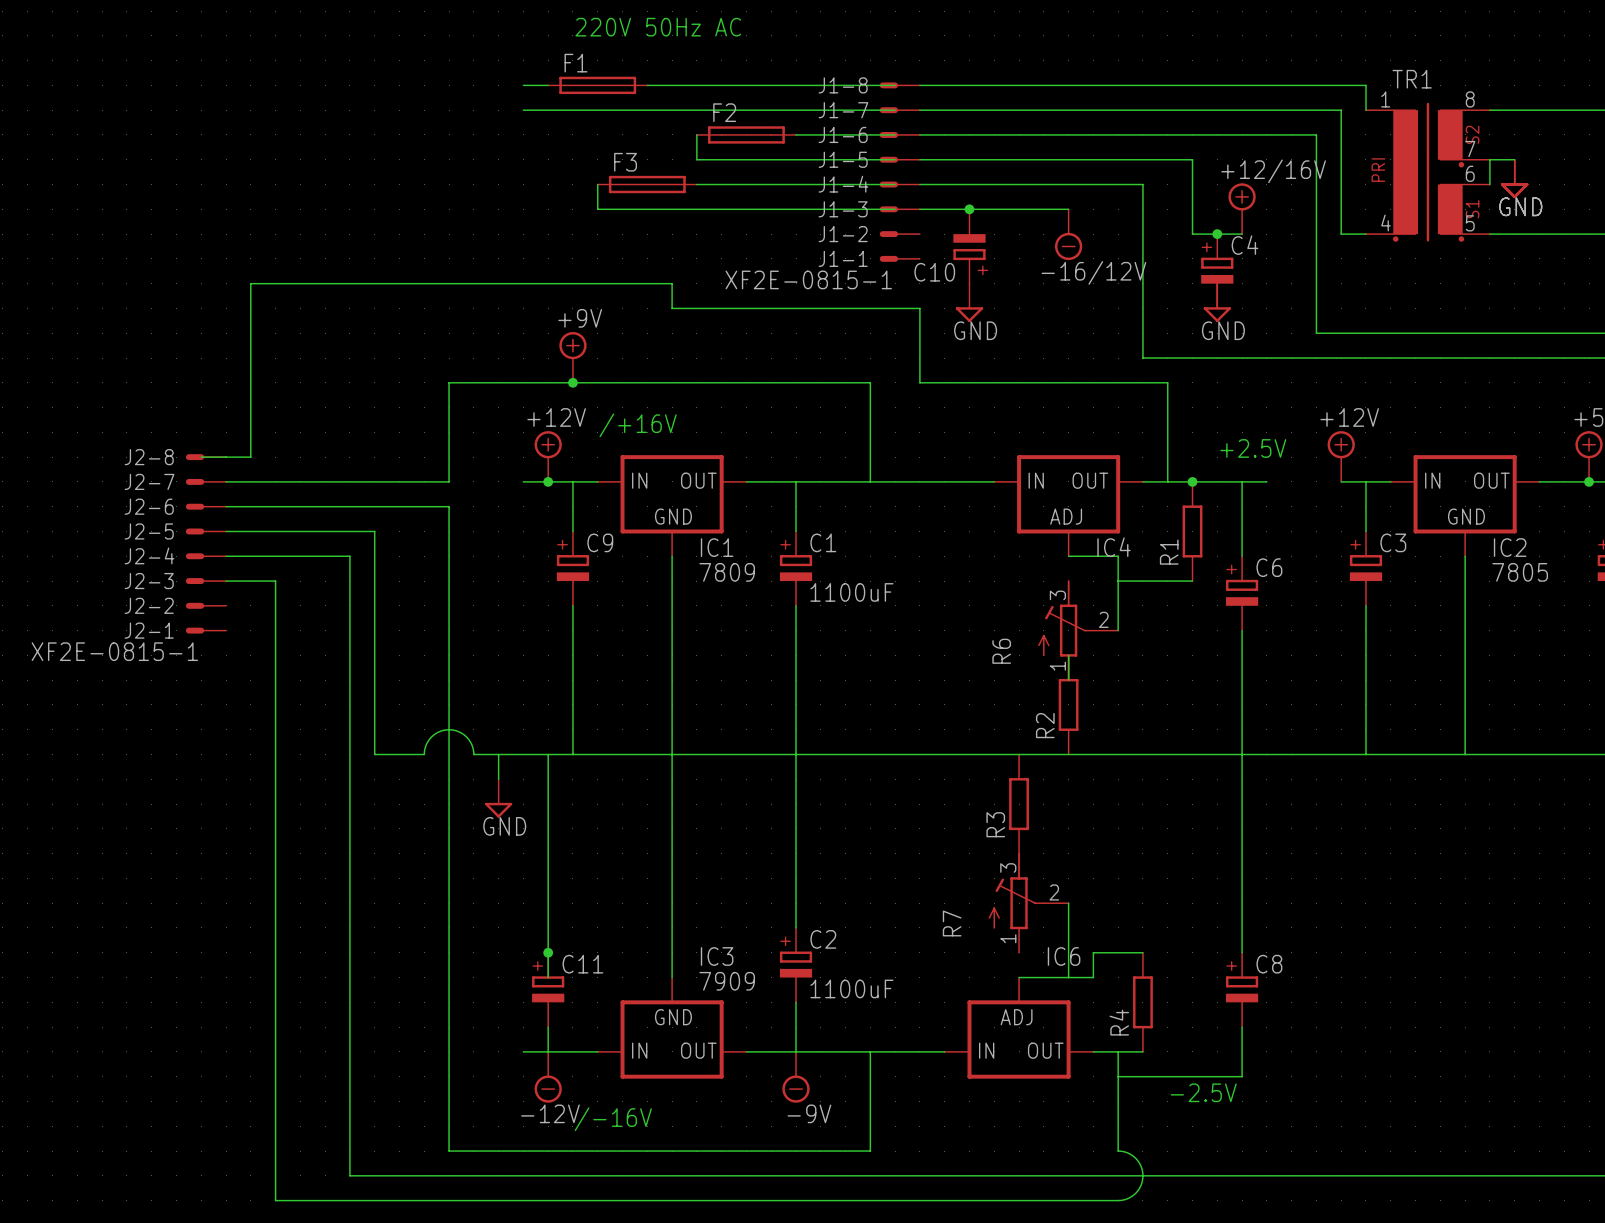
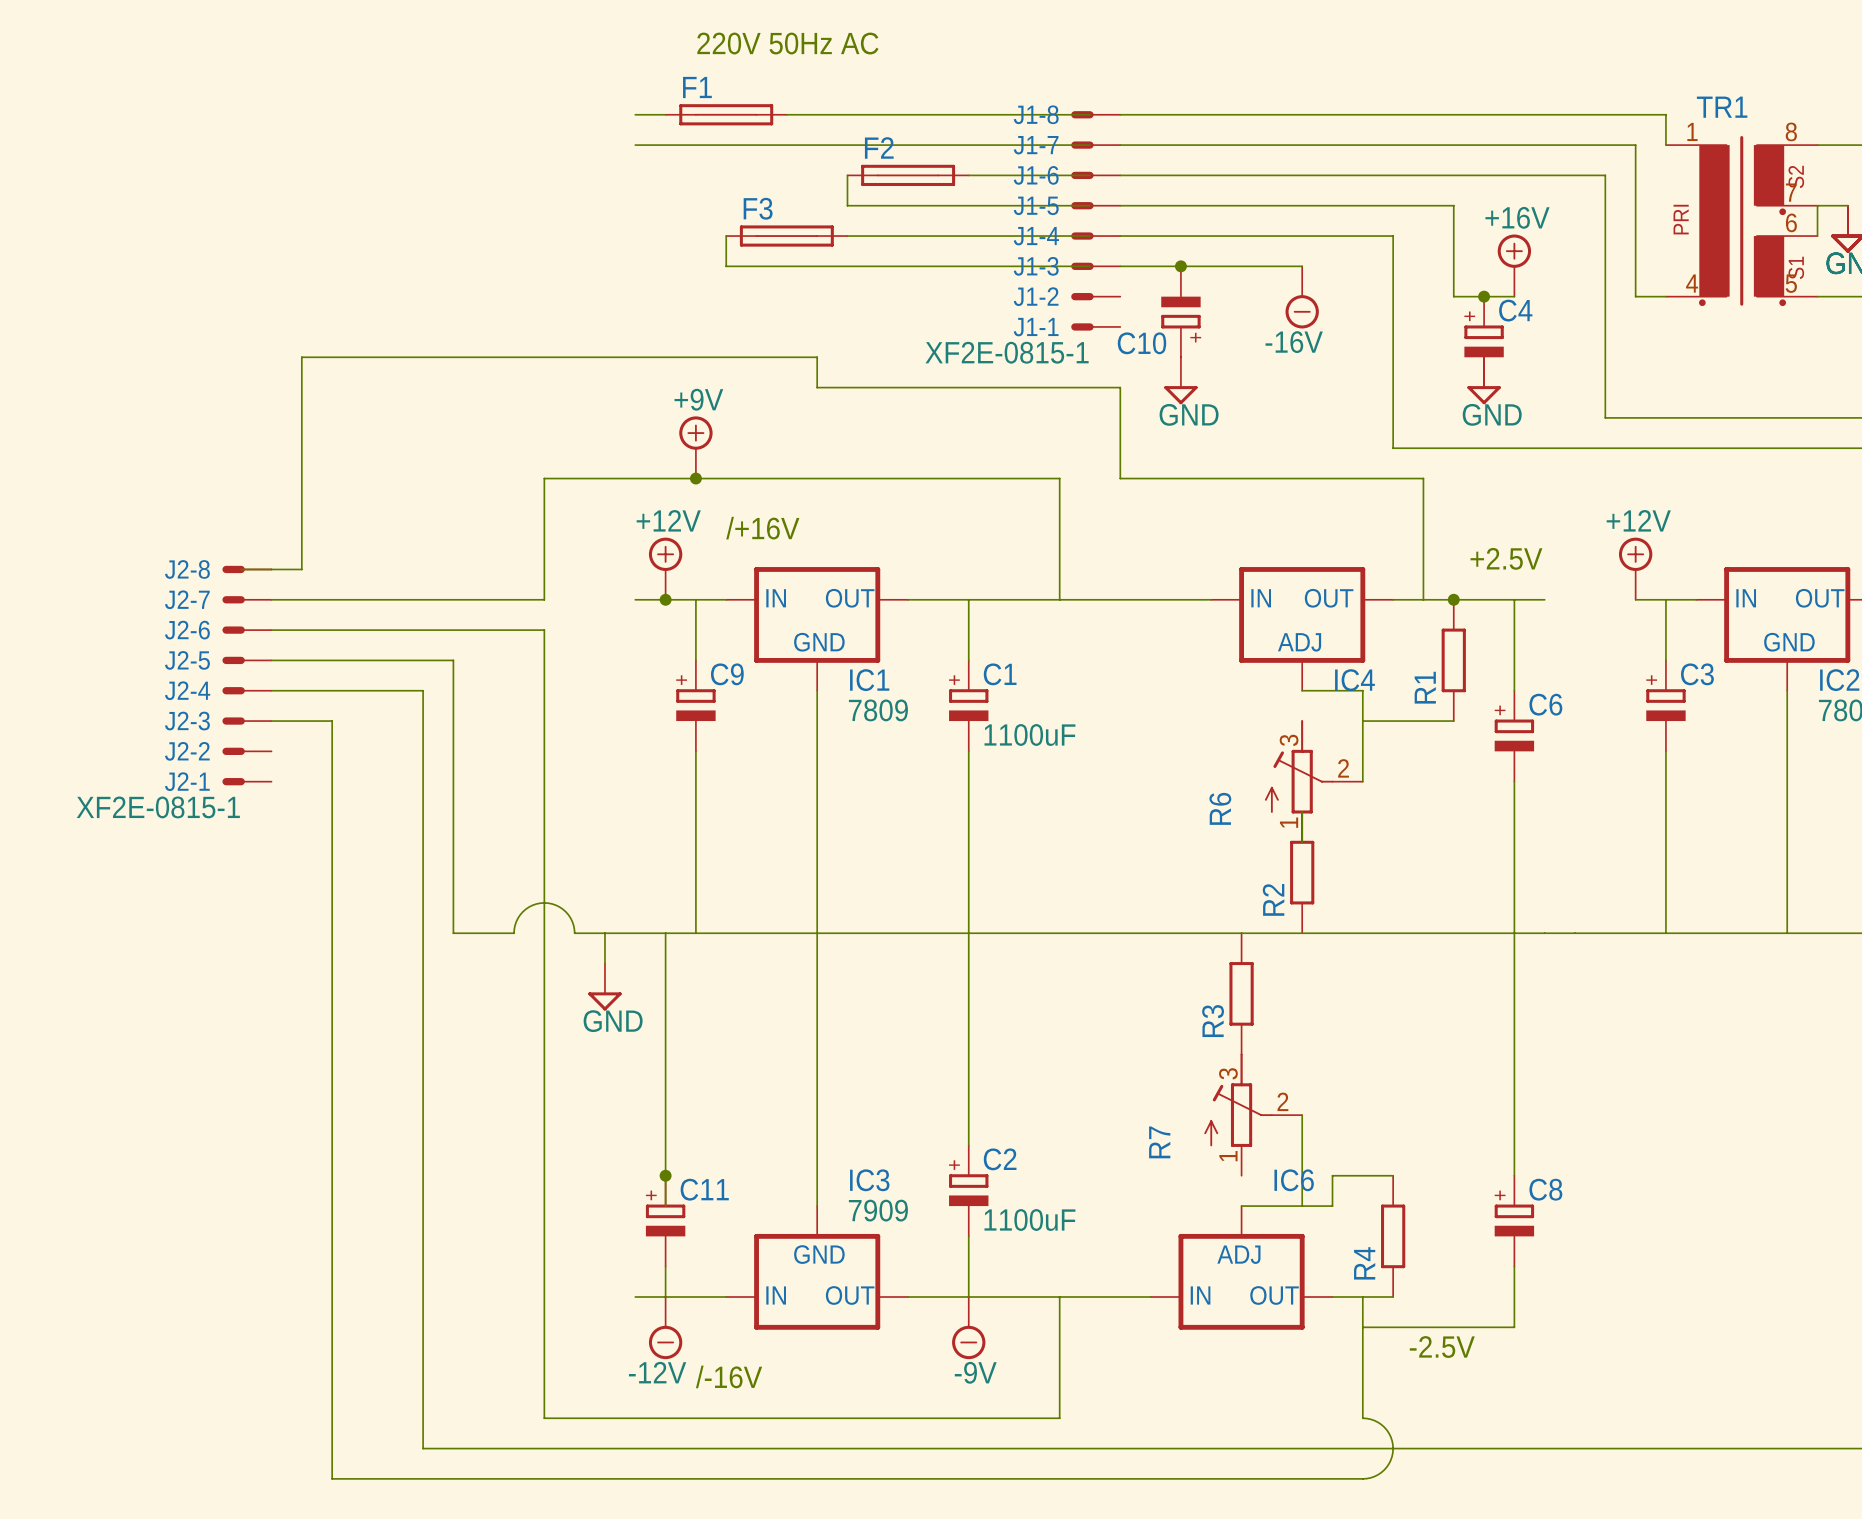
power symbol: +12/16V (1242, 208) -> +16V (1514, 265)
power symbol: -16/12V (1068, 234) -> -16V (1302, 297)

